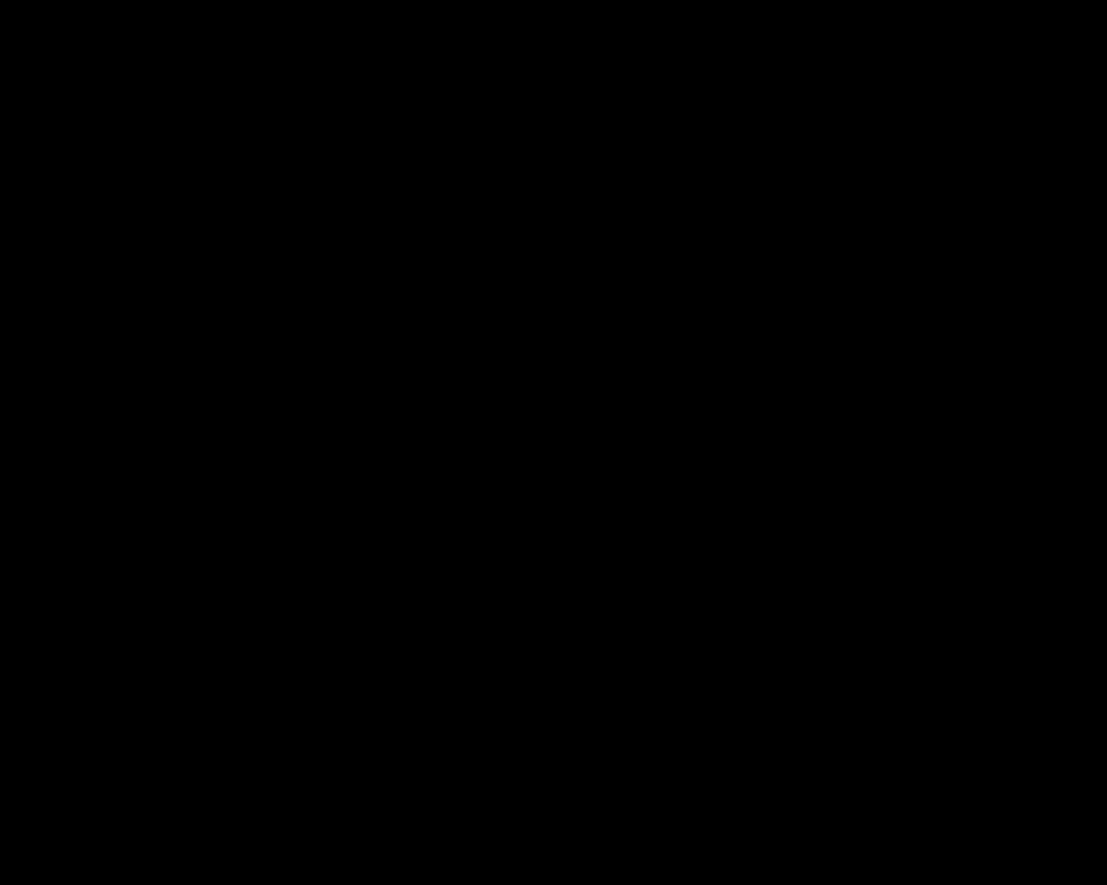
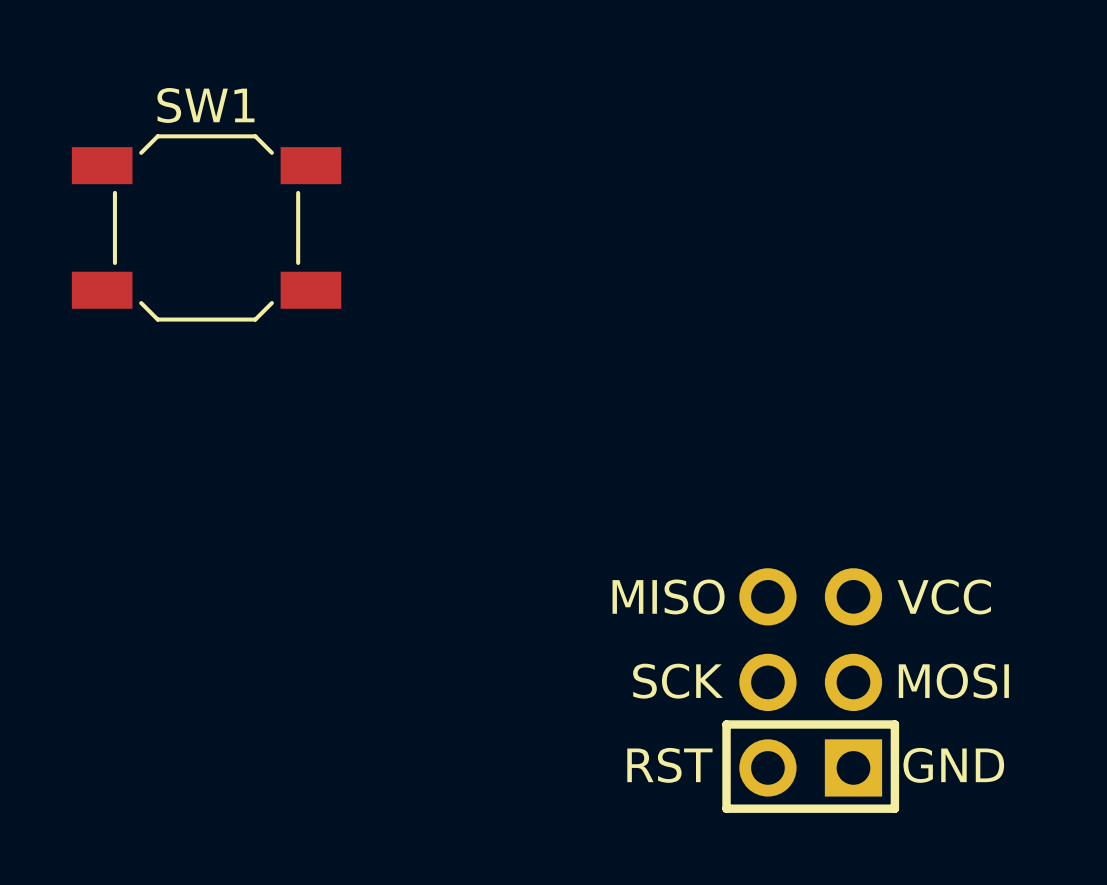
SW1: none -> (206, 227)
part: none -> (810, 690)

